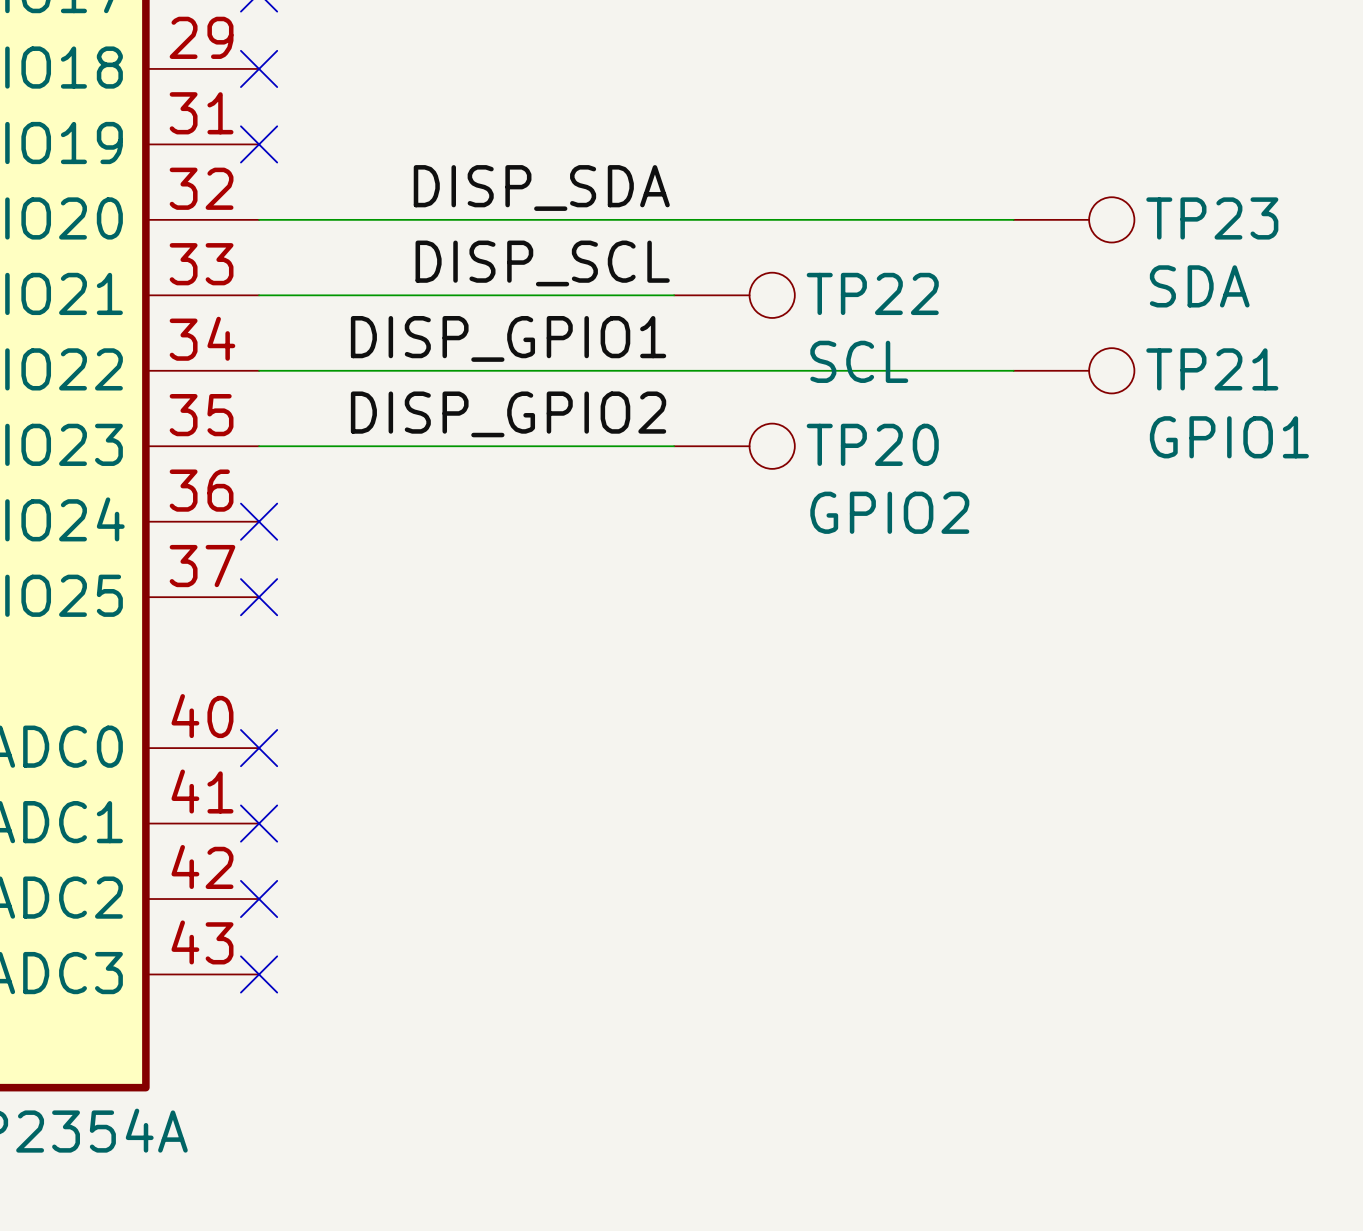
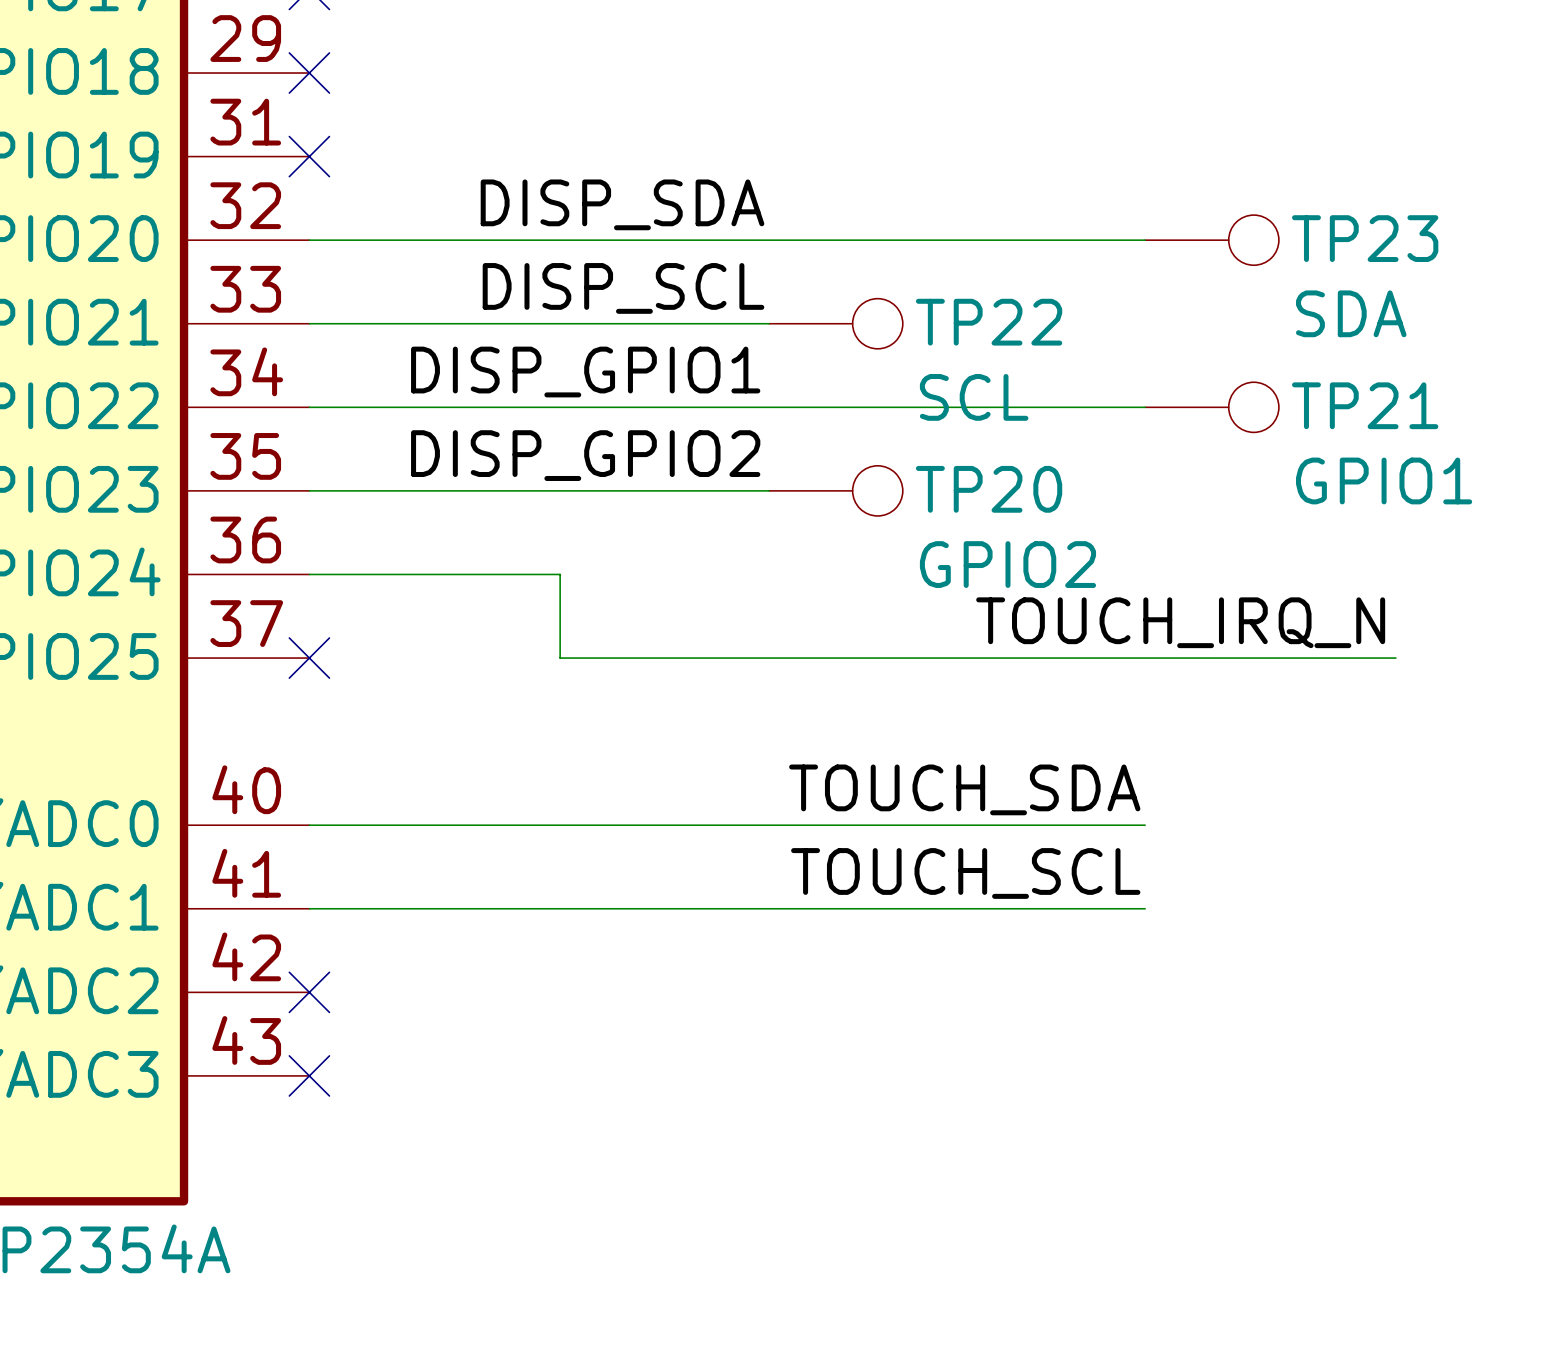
wire: none -> (309, 574) (560, 574) (560, 658) (1395, 658)
no-connect mark: (259, 521) -> none
label: none -> TOUCH_IRQ_N (1180, 622)
label: none -> TOUCH_SDA (964, 789)
wire: none -> (309, 825) (1145, 825)
no-connect mark: (259, 748) -> none
label: none -> TOUCH_SCL (965, 873)
wire: none -> (309, 908) (1145, 908)
no-connect mark: (259, 823) -> none

